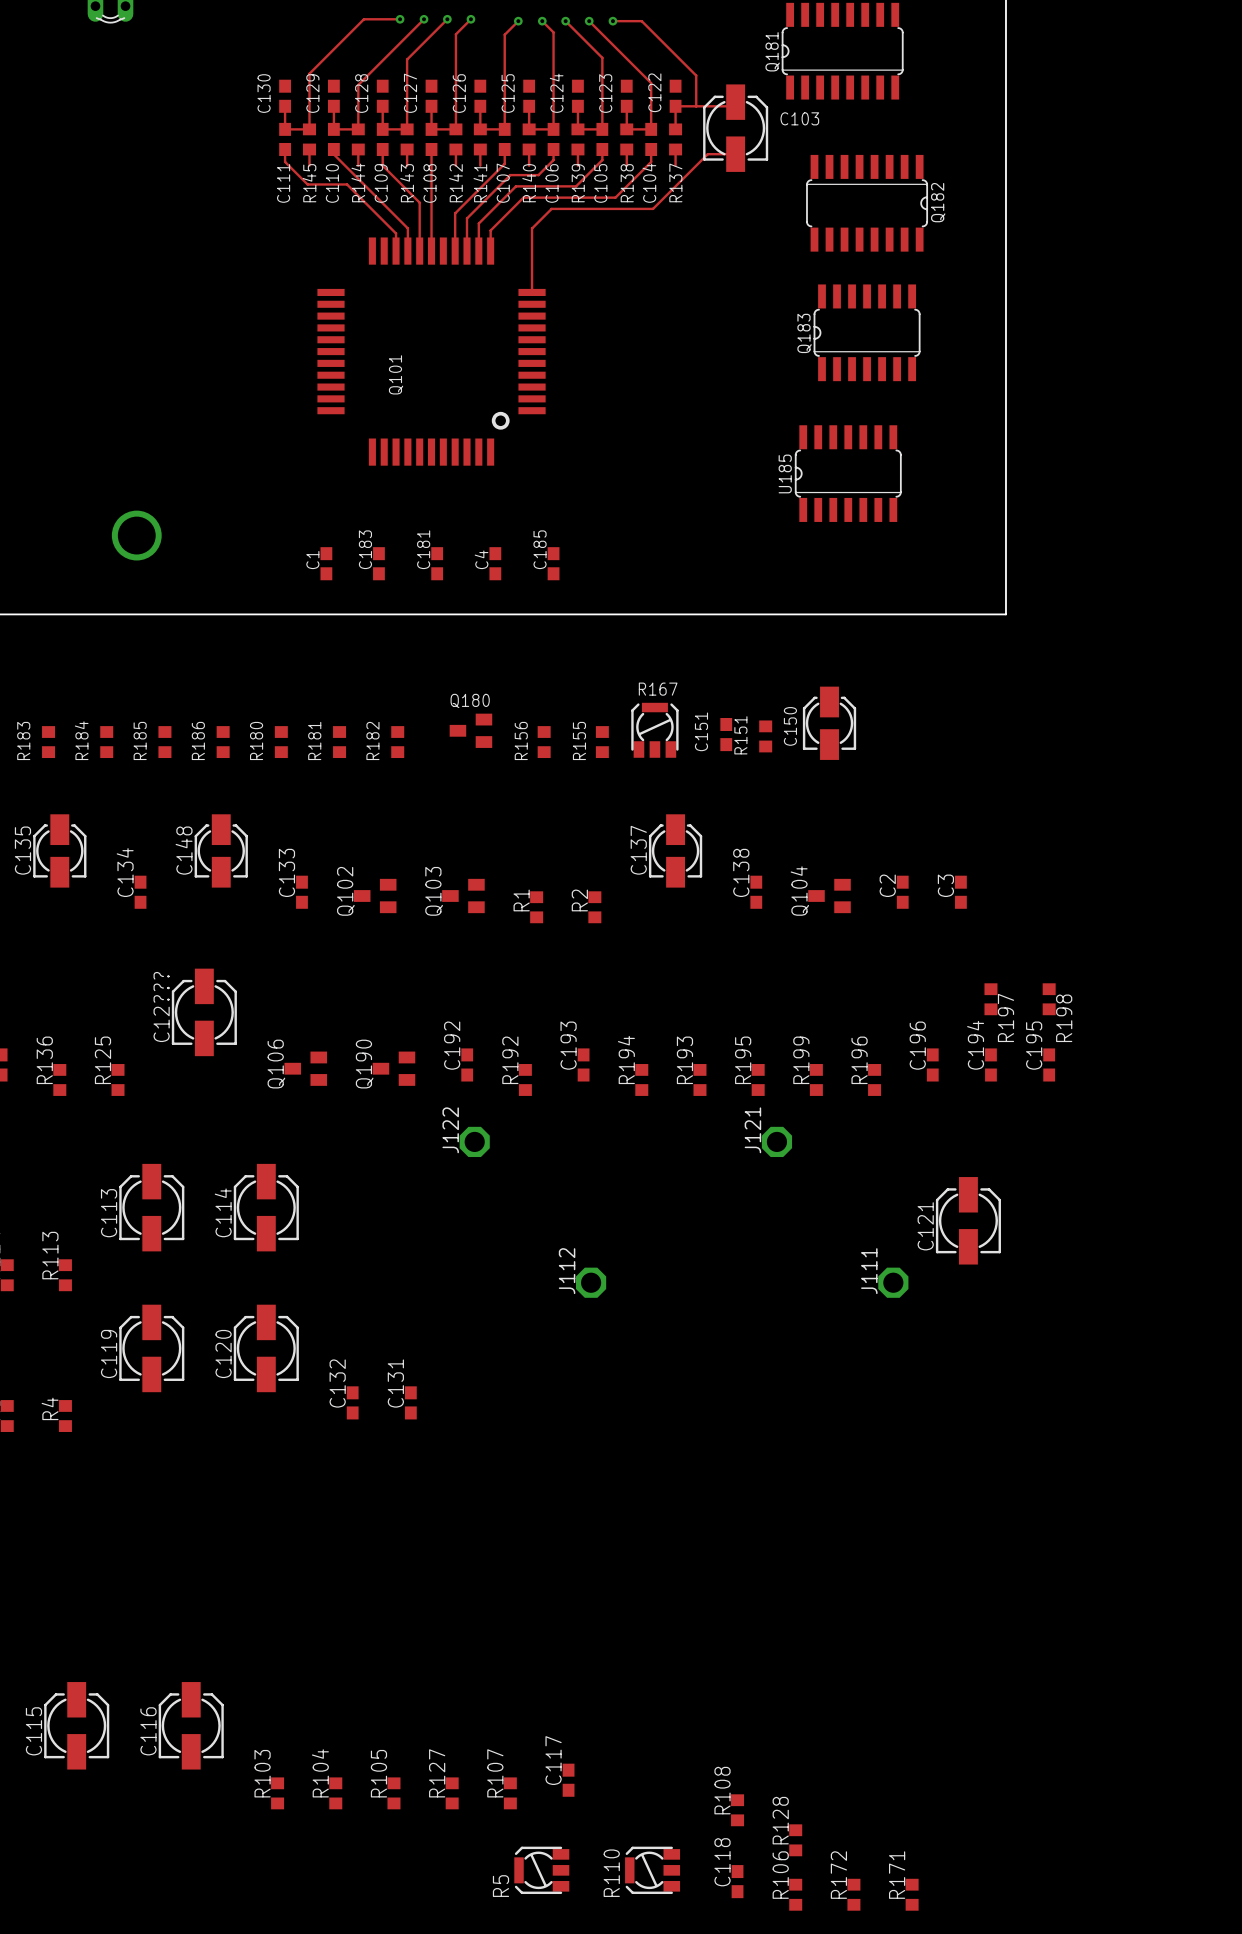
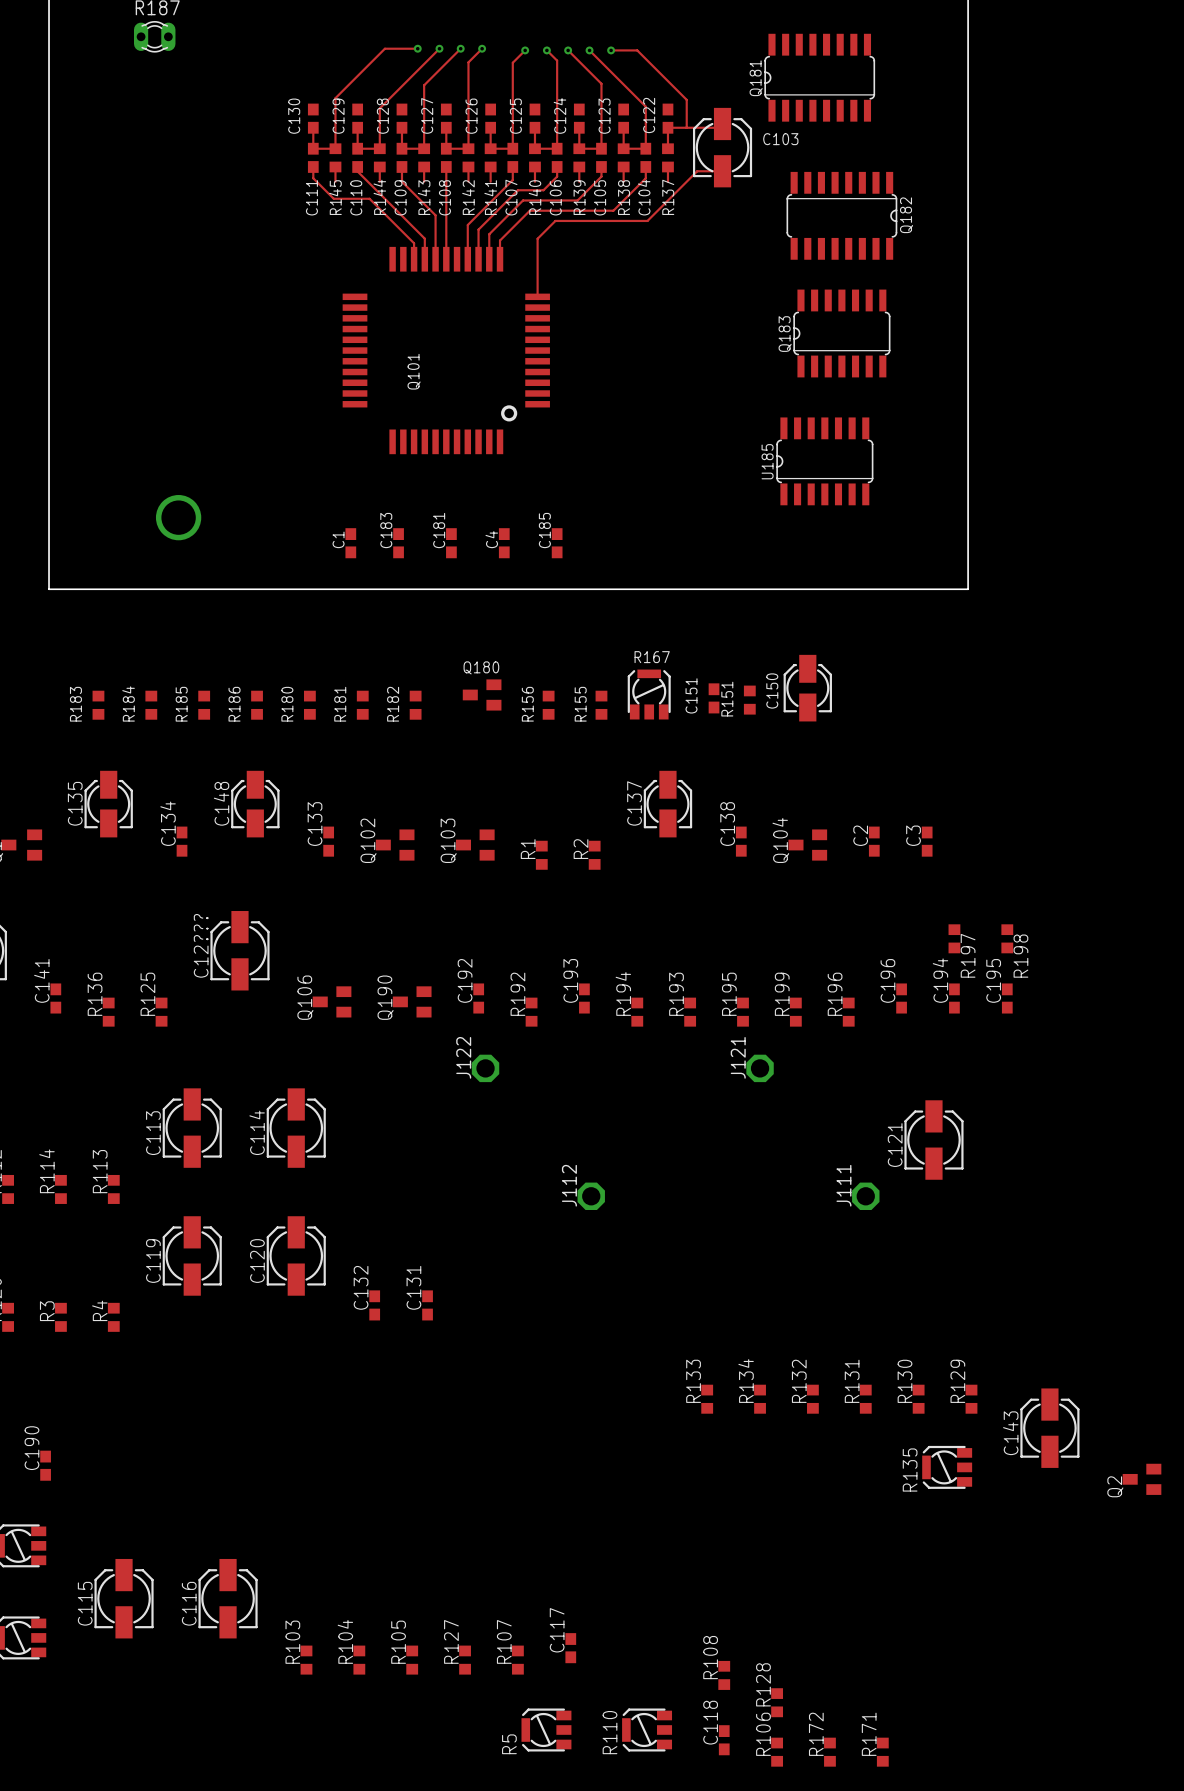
R133: none -> (707, 1399)
R134: none -> (760, 1399)
R132: none -> (812, 1399)
R131: none -> (865, 1399)
R130: none -> (918, 1399)
R129: none -> (971, 1399)
C143: none -> (1049, 1428)
R135: none -> (947, 1467)
Q2: none -> (1142, 1479)

